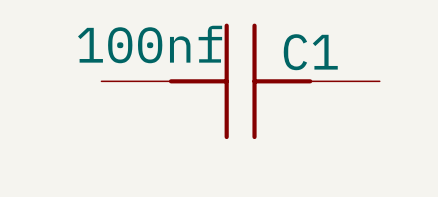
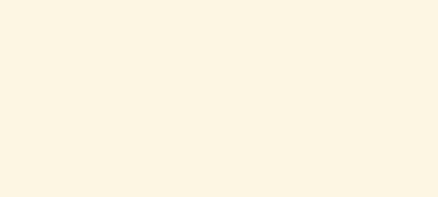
C1: 100nf (240, 81) -> none

